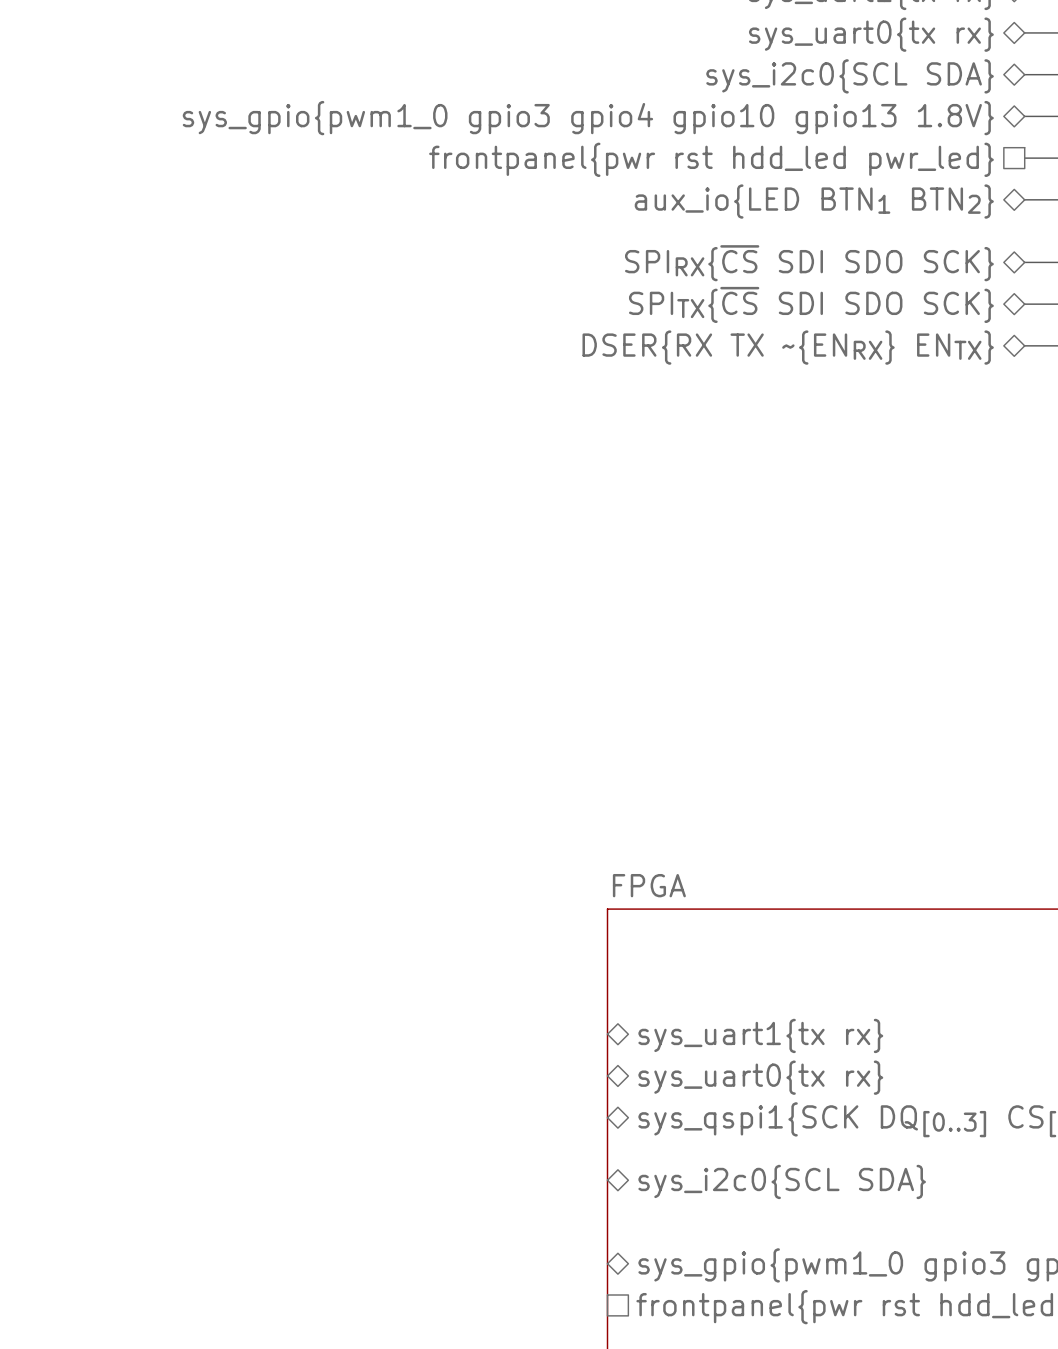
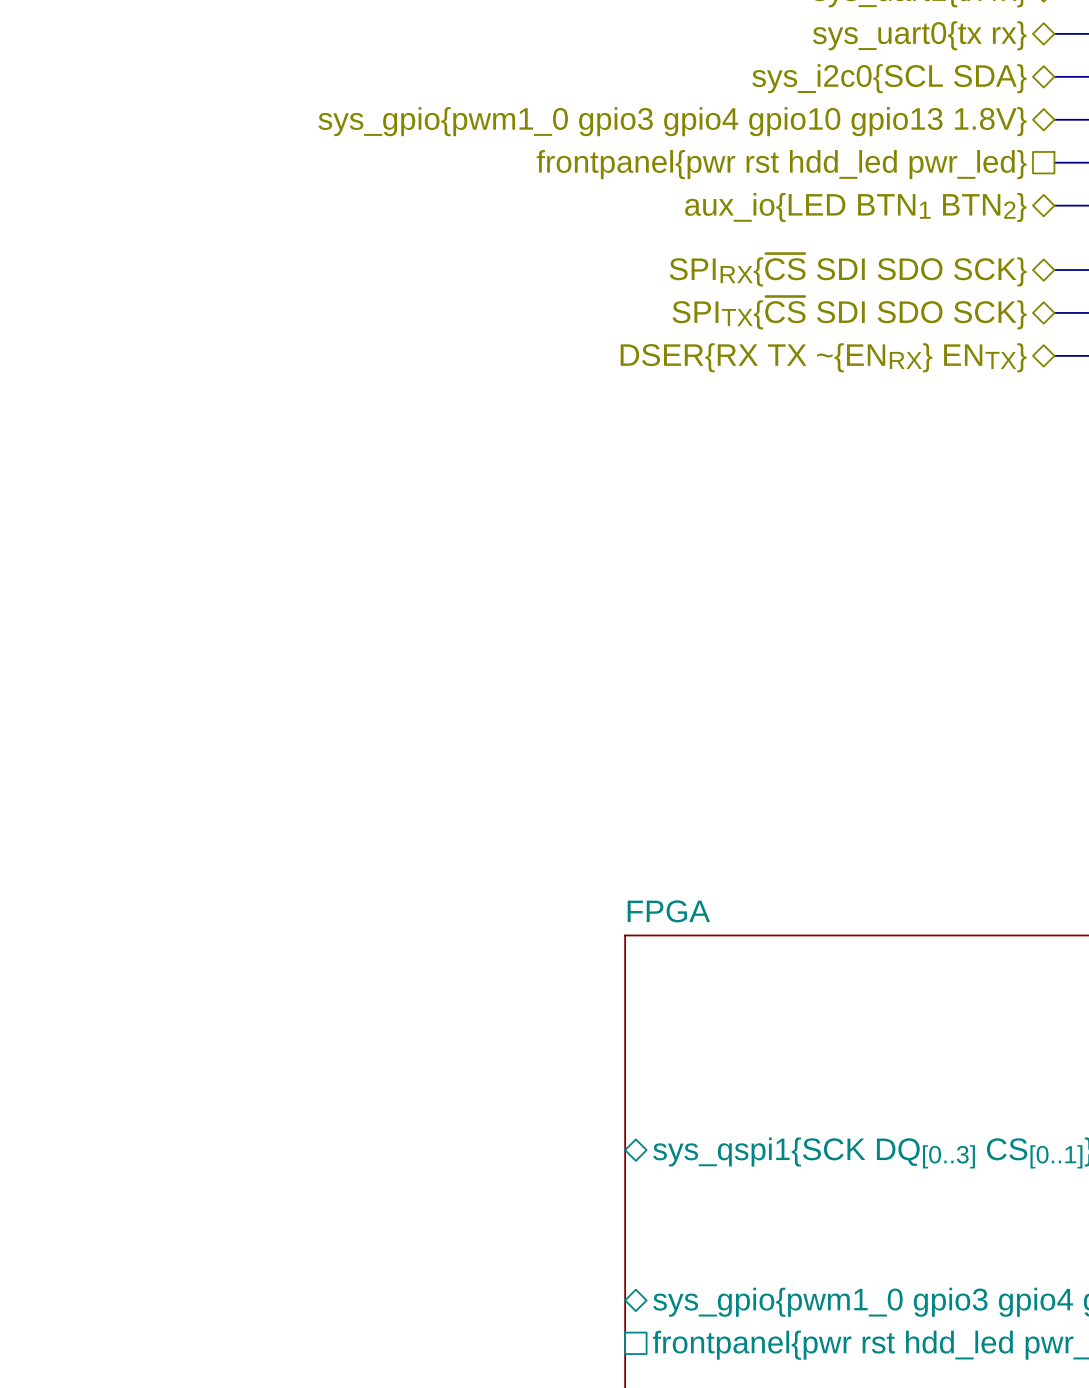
sheet pin: sys_uart1{tx rx} (760, 1035) -> none
sheet pin: sys_uart0{tx rx} (760, 1077) -> none
sheet pin: sys_i2c0{SCL SDA} (782, 1181) -> none

